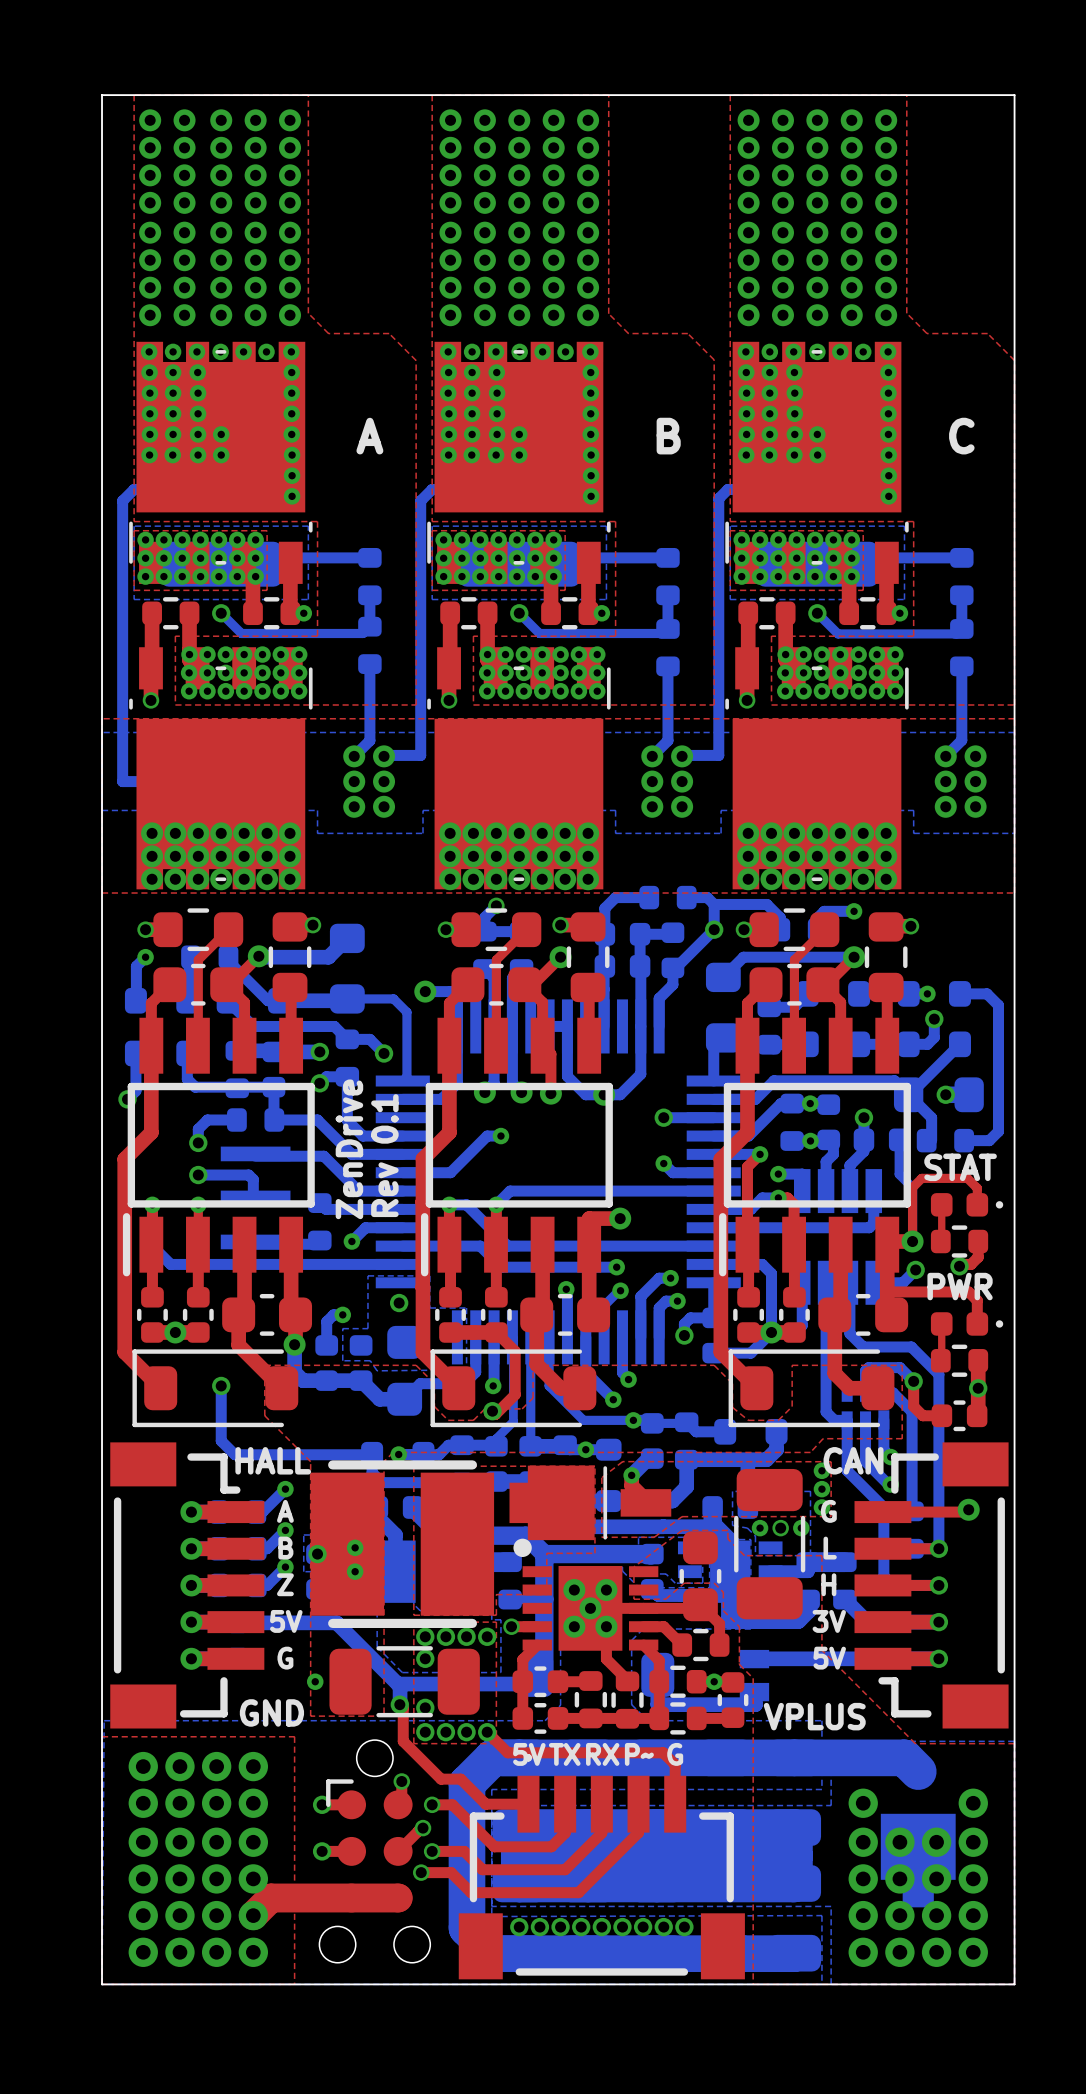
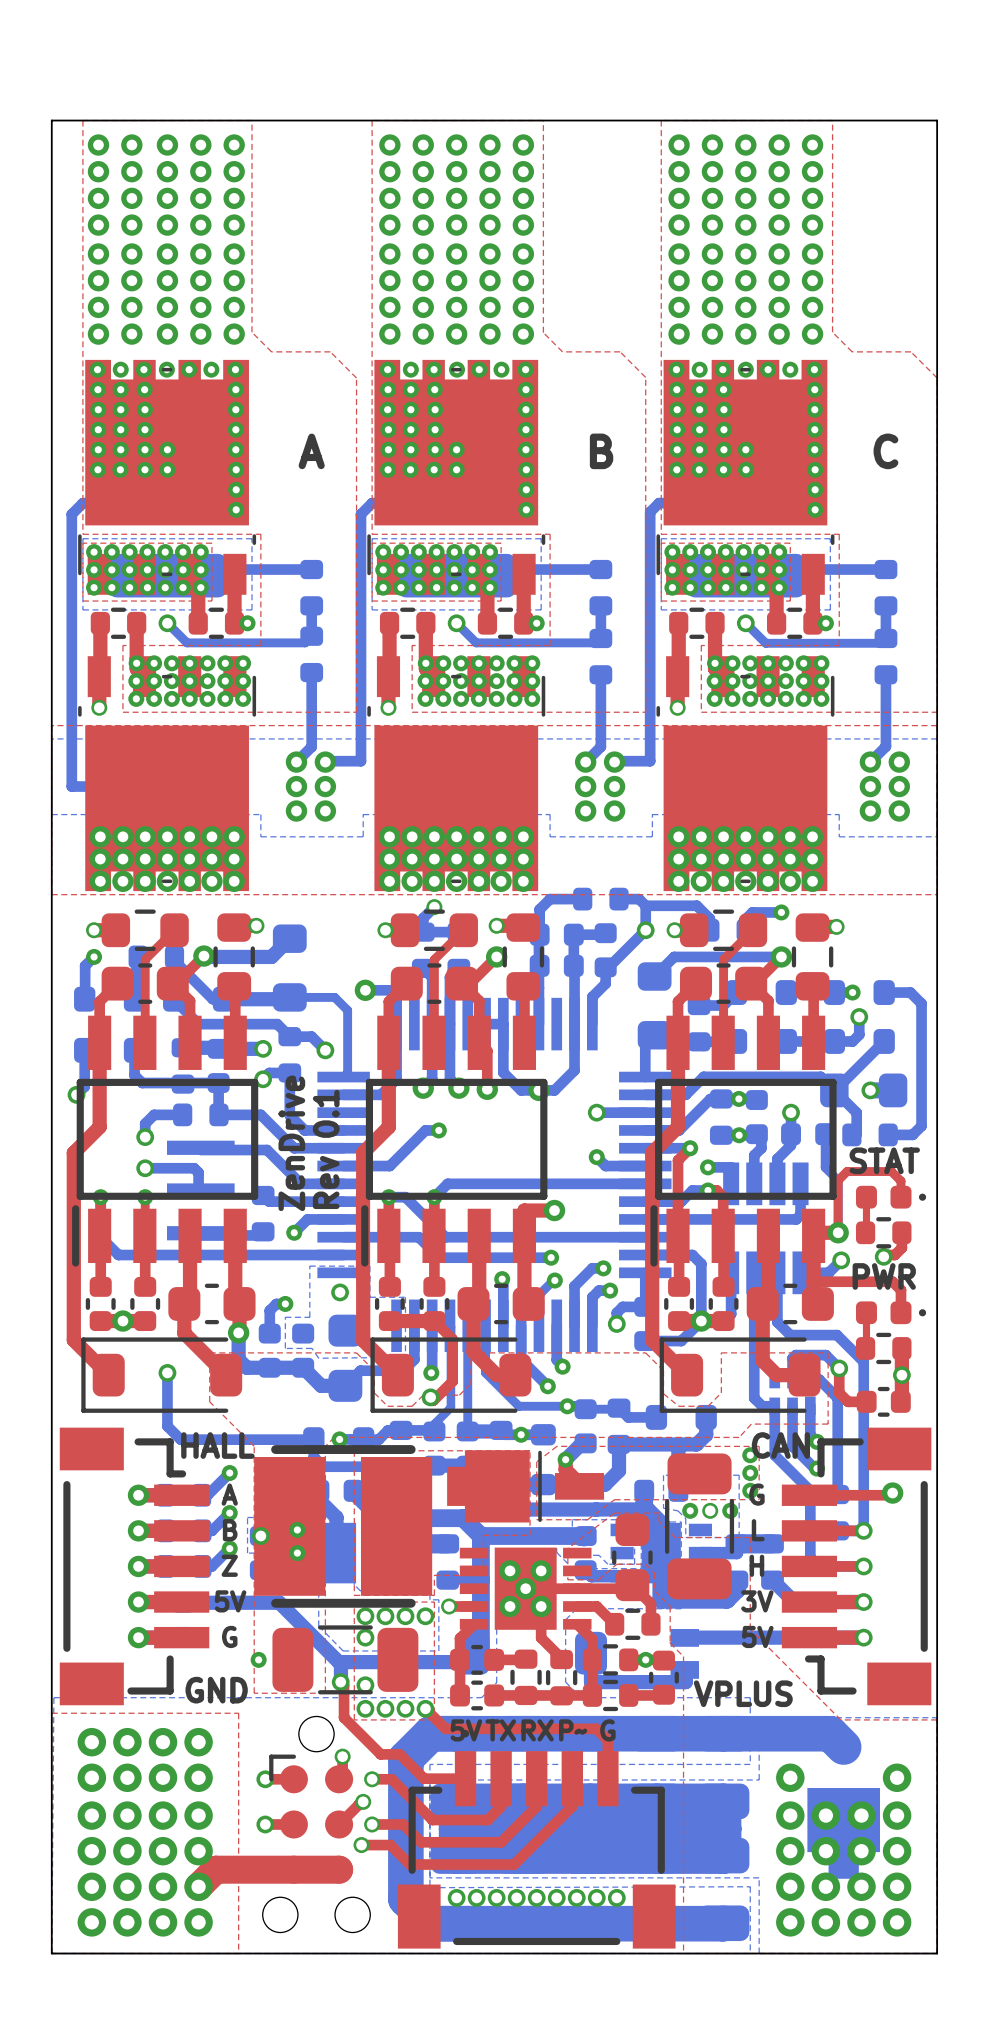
part footprint: [513, 1538, 659, 1651] -> [455, 1534, 592, 1630]

